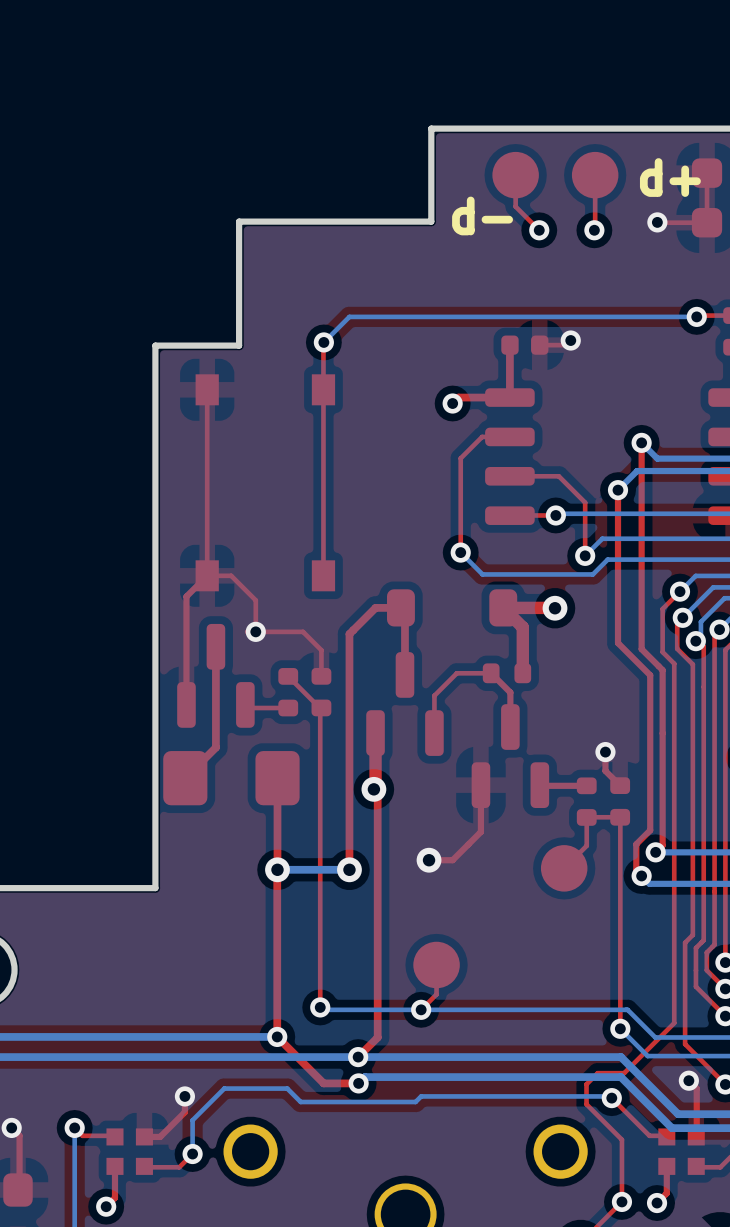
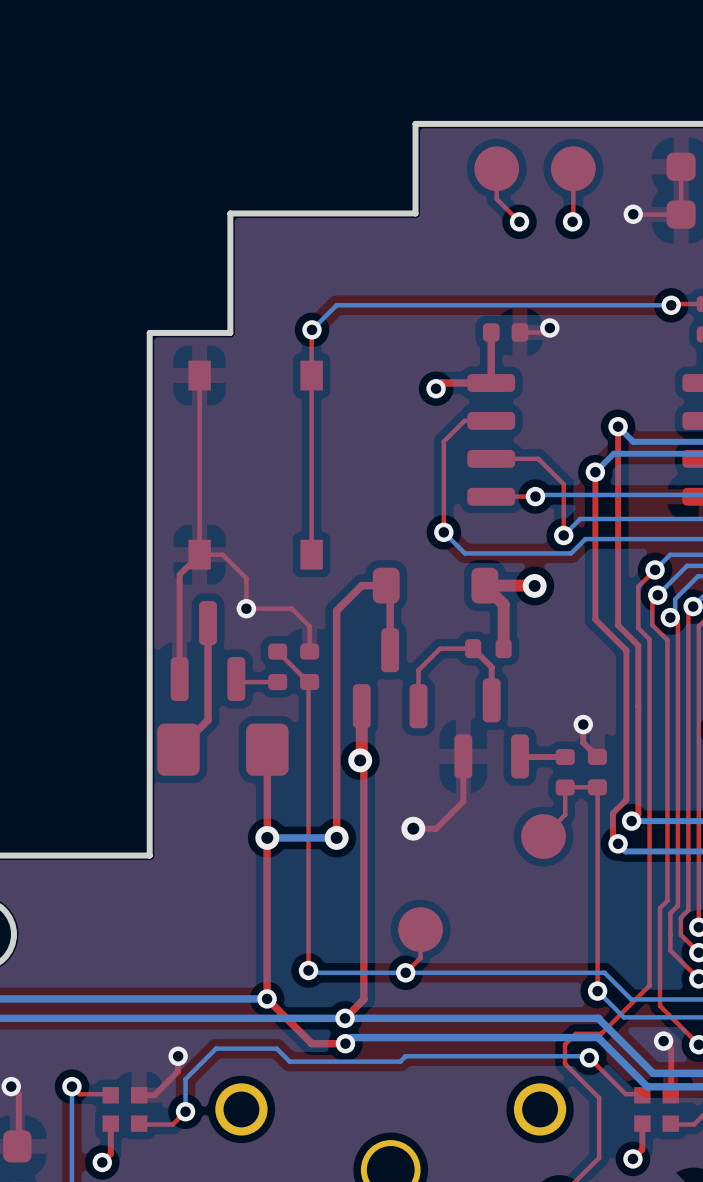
text: d+ (670, 177) -> none
text: d- (482, 215) -> none
via: (621, 1201) -> none

